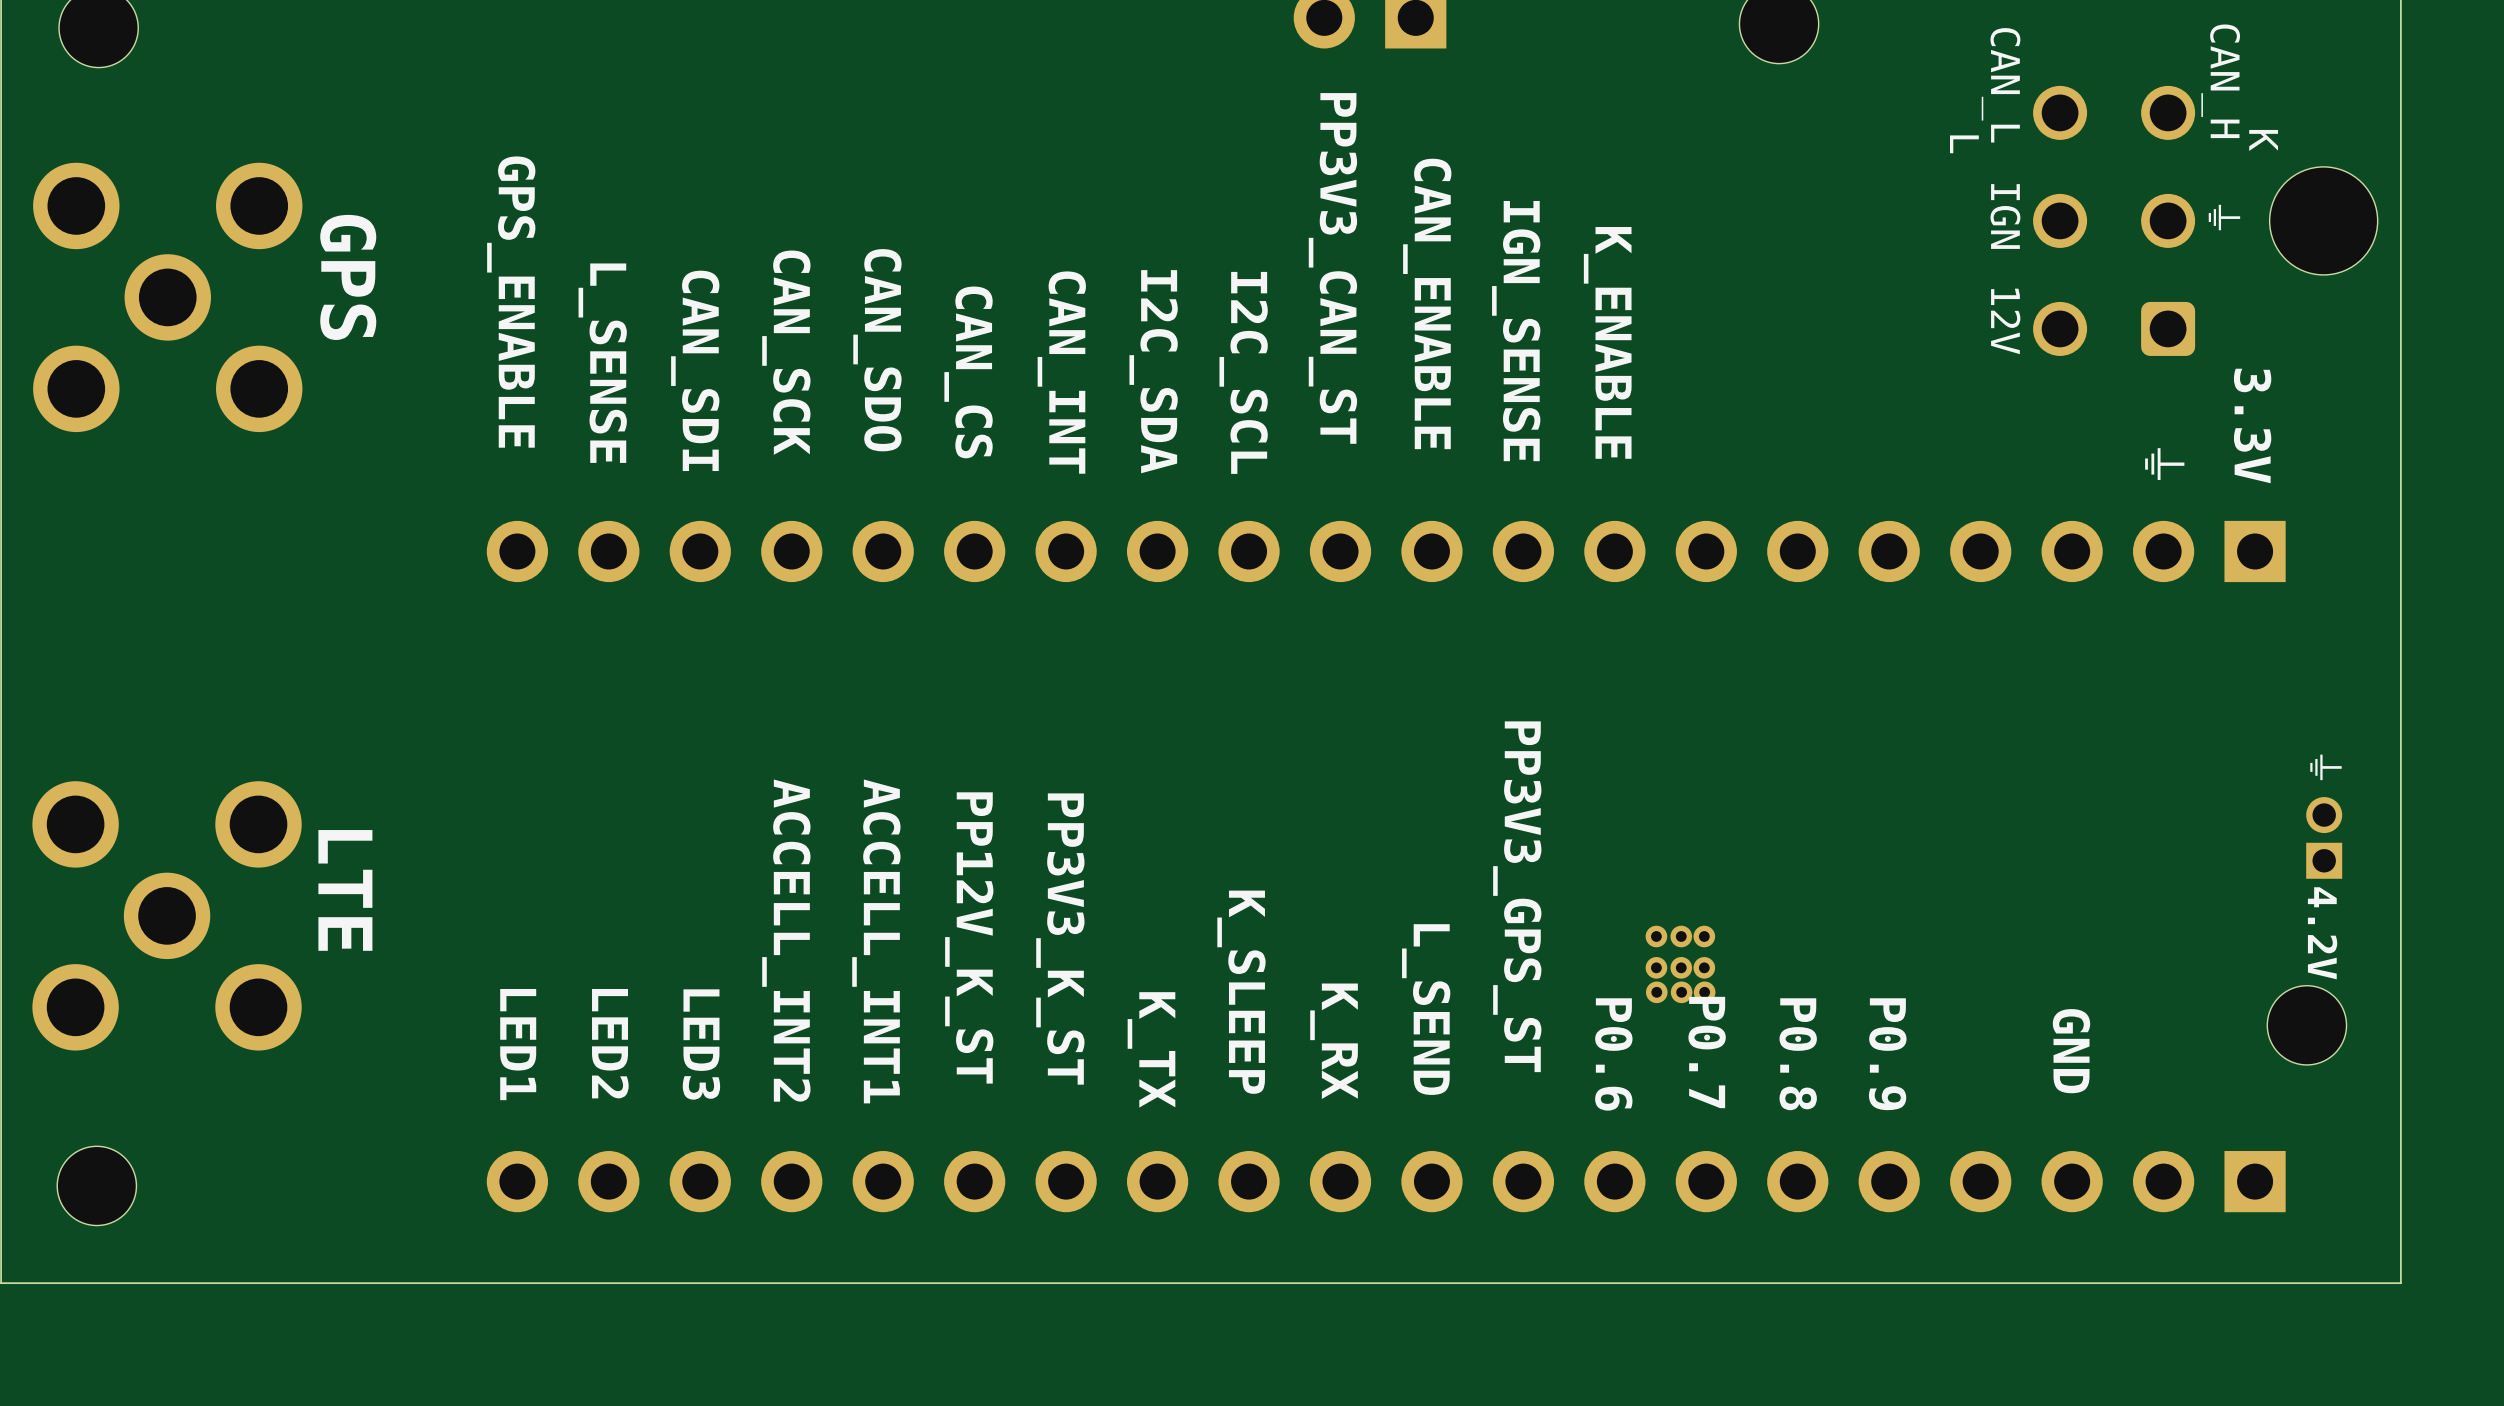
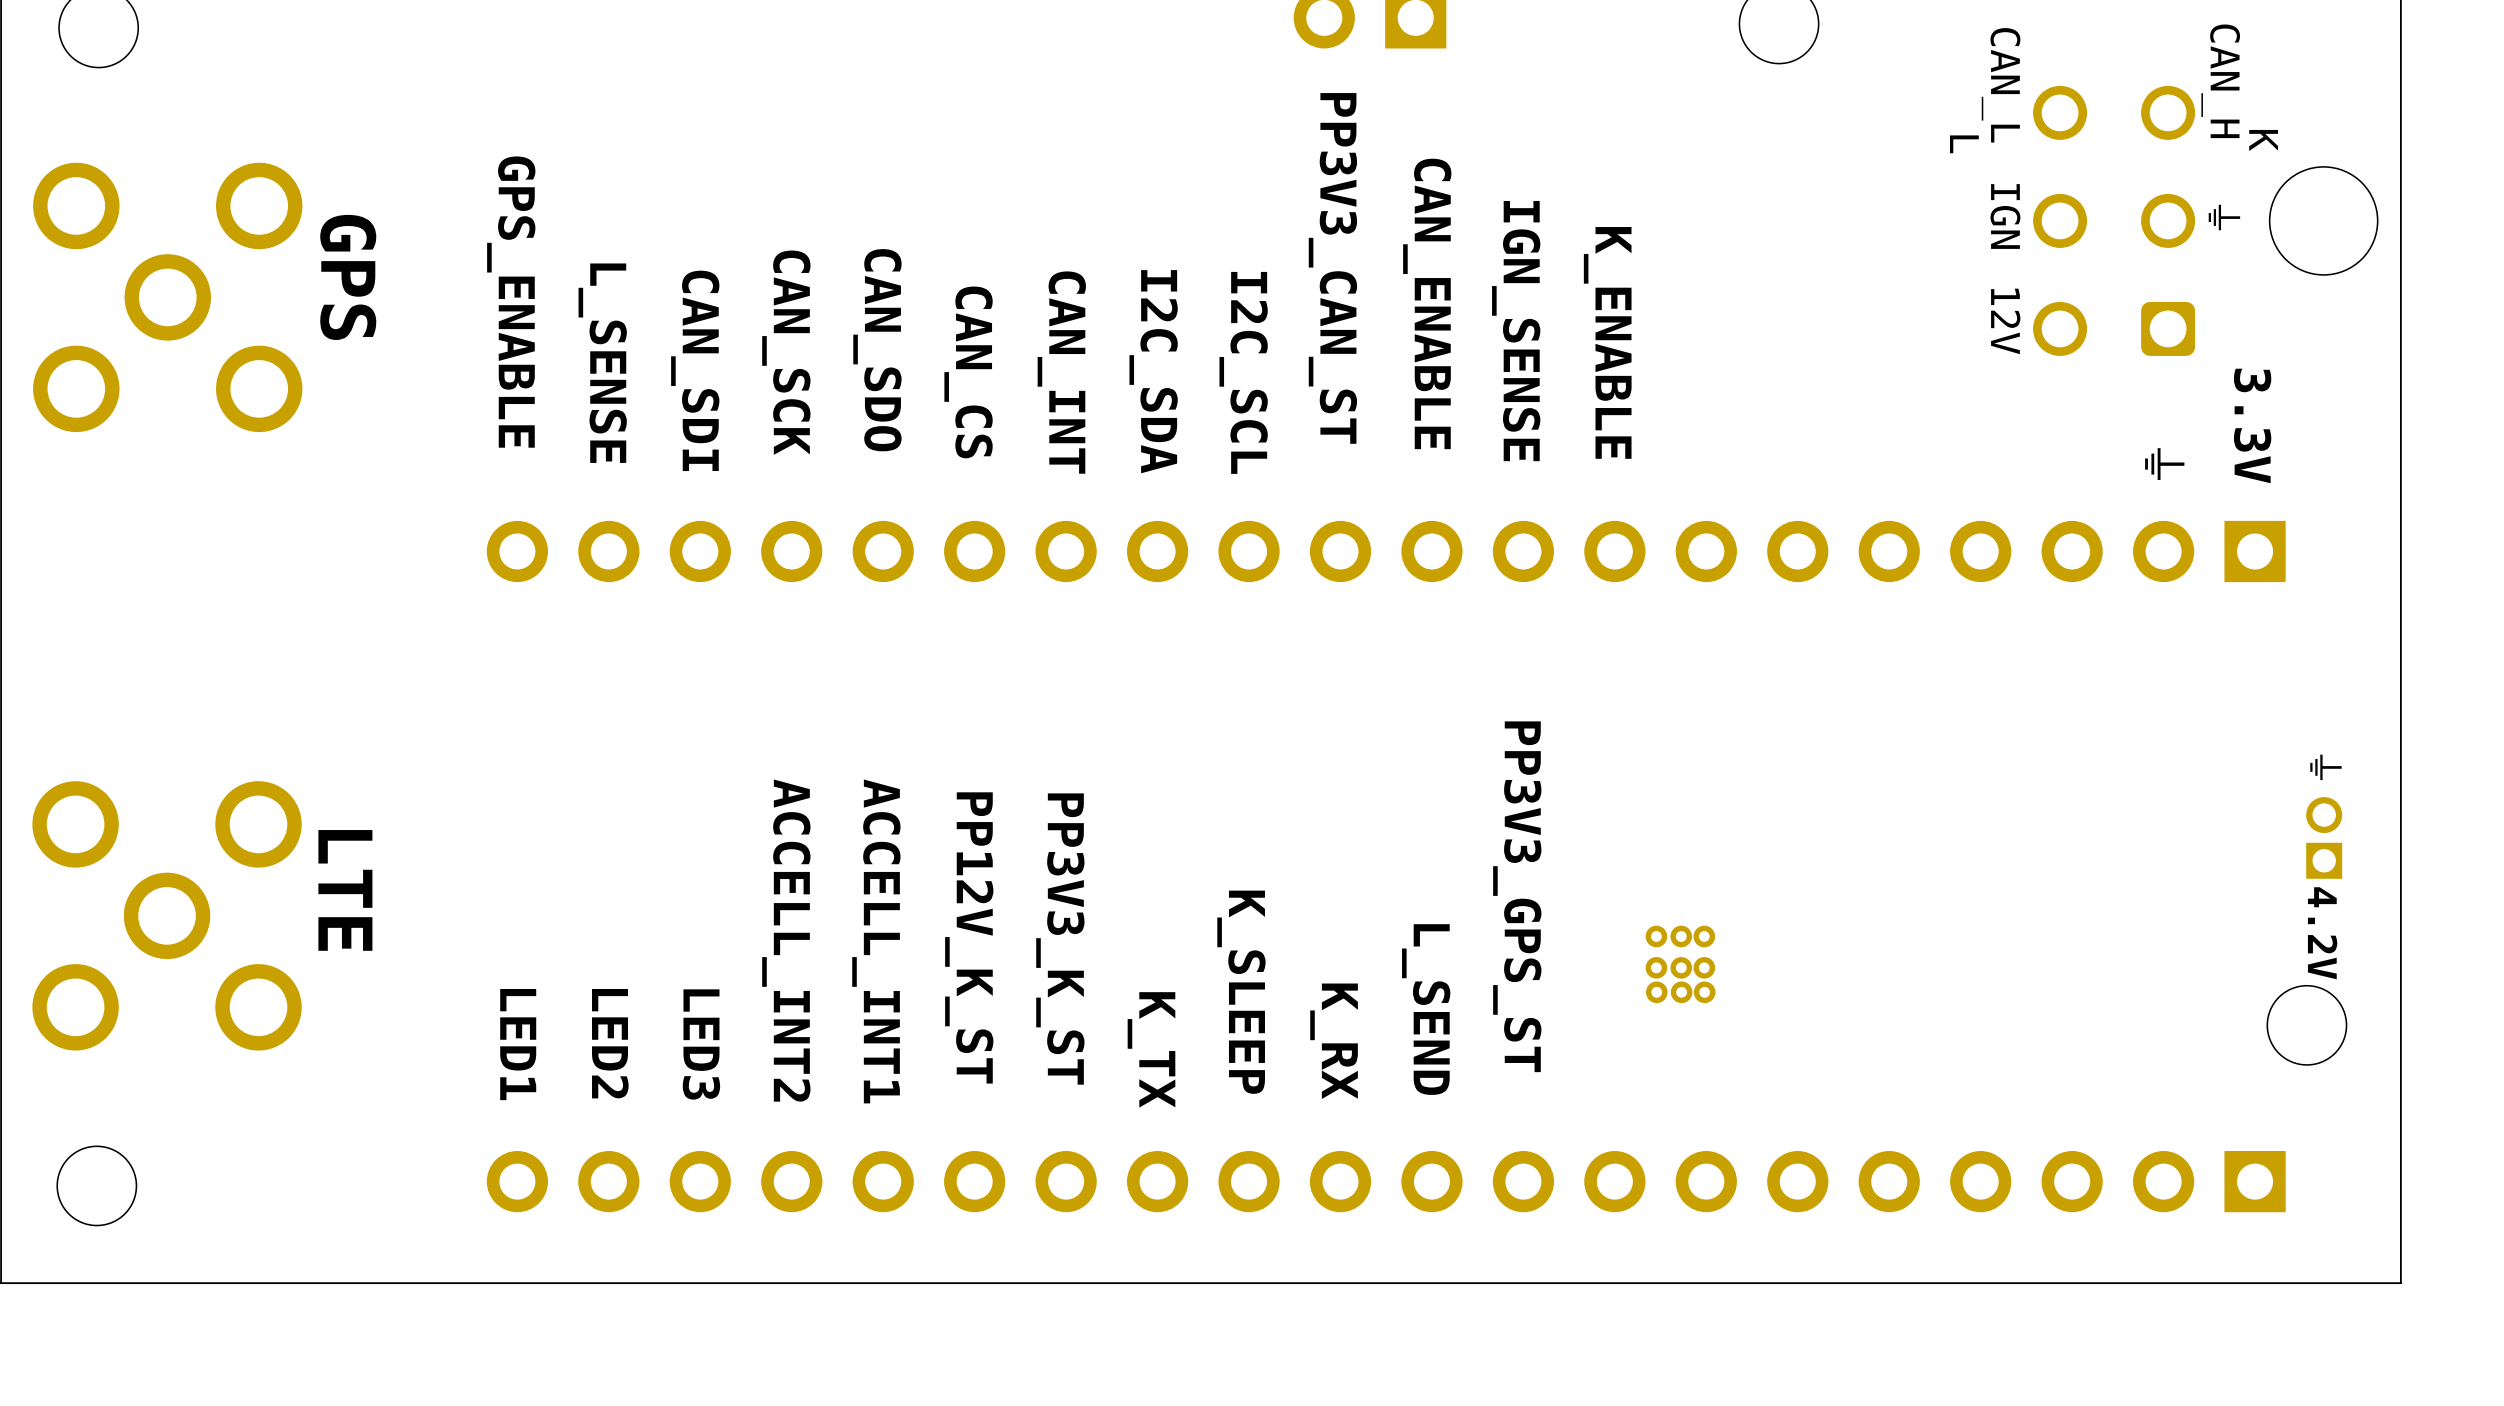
text: GND (2071, 1051) -> none
text: P0.7 (1707, 1052) -> none
text: P0.6 (1613, 1054) -> none
text: P0.8 (1798, 1054) -> none
text: P0.9 (1887, 1054) -> none

